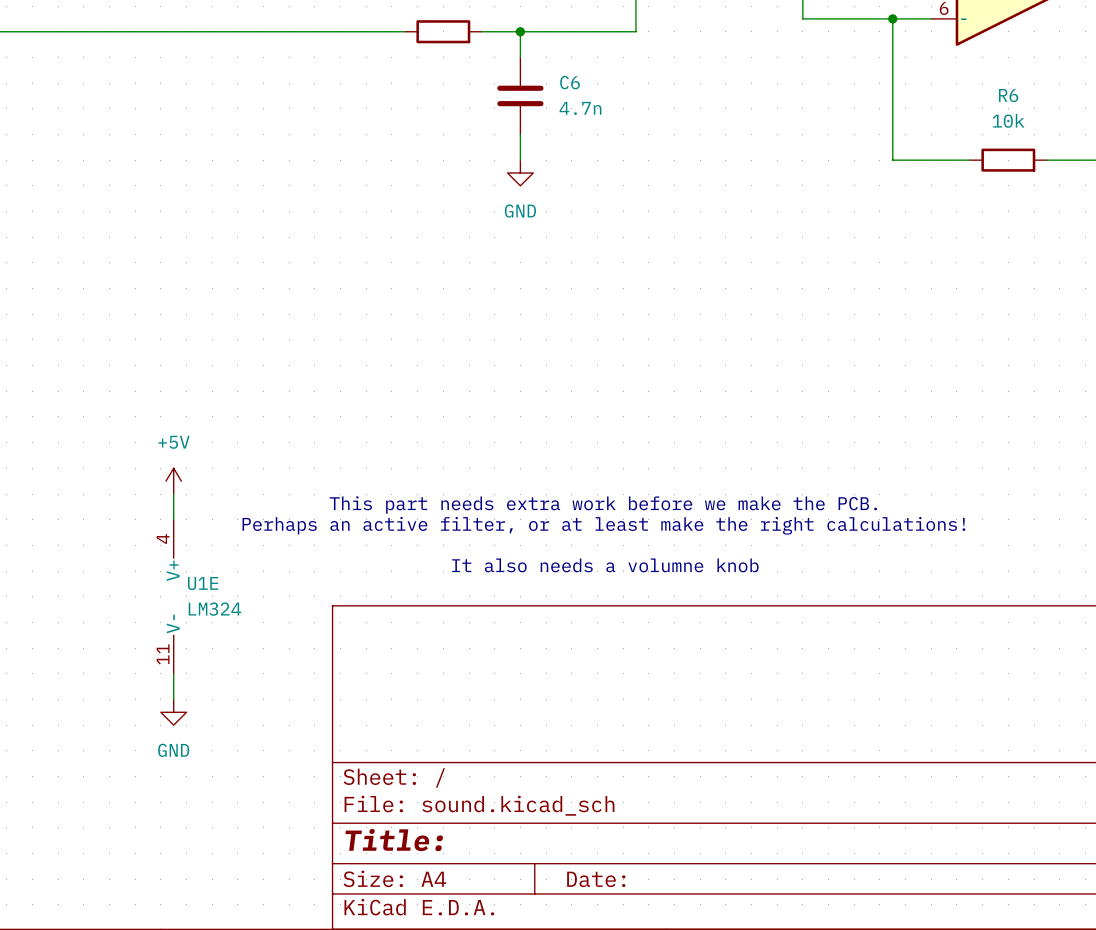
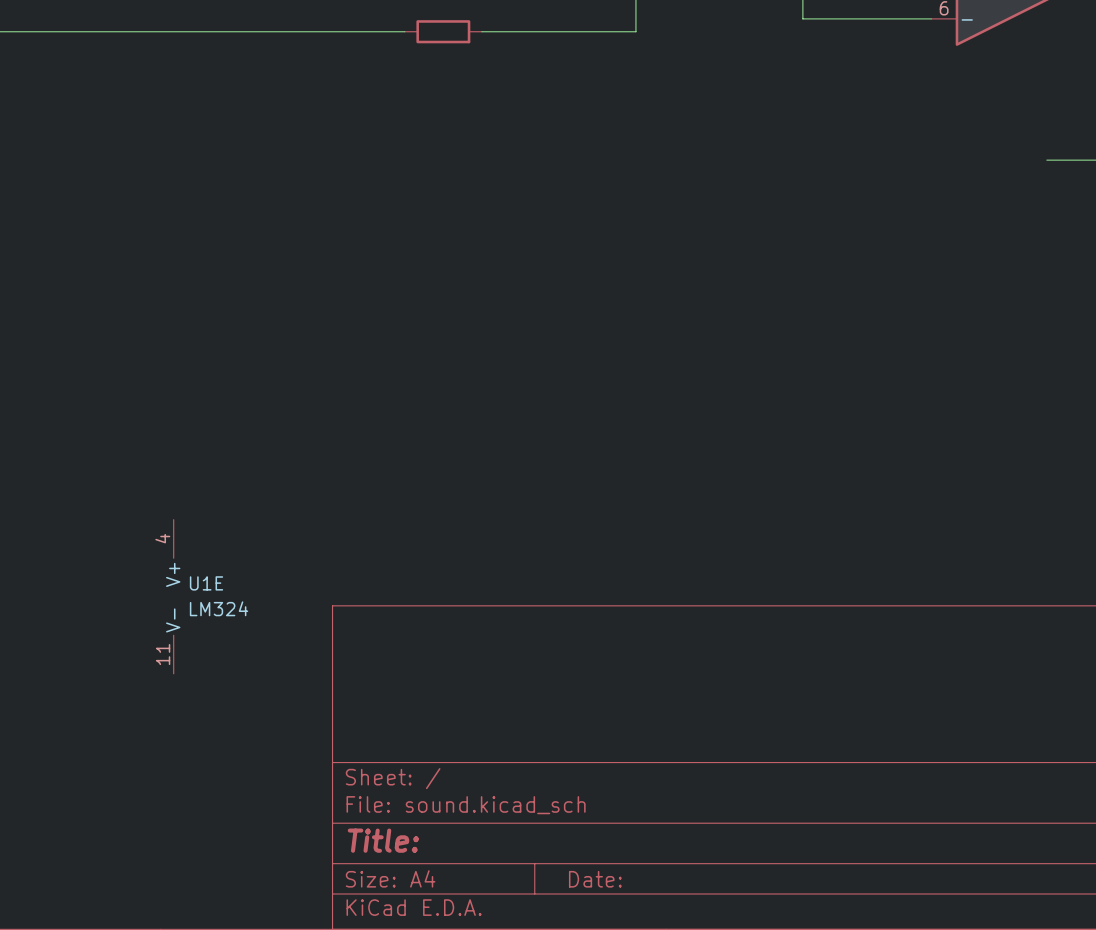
wire: (892, 18) (892, 160) (969, 160) -> none
junction: (892, 18) -> none
wire: (520, 31) (520, 57) -> none
junction: (520, 31) -> none
C6: 4.7n (520, 95) -> none
wire: (520, 134) (520, 160) -> none
R6: 10k (1008, 160) -> none
power symbol: GND (520, 172) -> none
power symbol: +5V (173, 481) -> none
wire: (173, 494) (173, 519) -> none
text: This part needs extra work before we make the PCB. (603, 505) -> none
text: Perhaps an active filter, or at least make the right calculations! (603, 525) -> none
text: It also needs a volumne knob (605, 565) -> none
wire: (173, 673) (173, 699) -> none
power symbol: GND (173, 712) -> none

